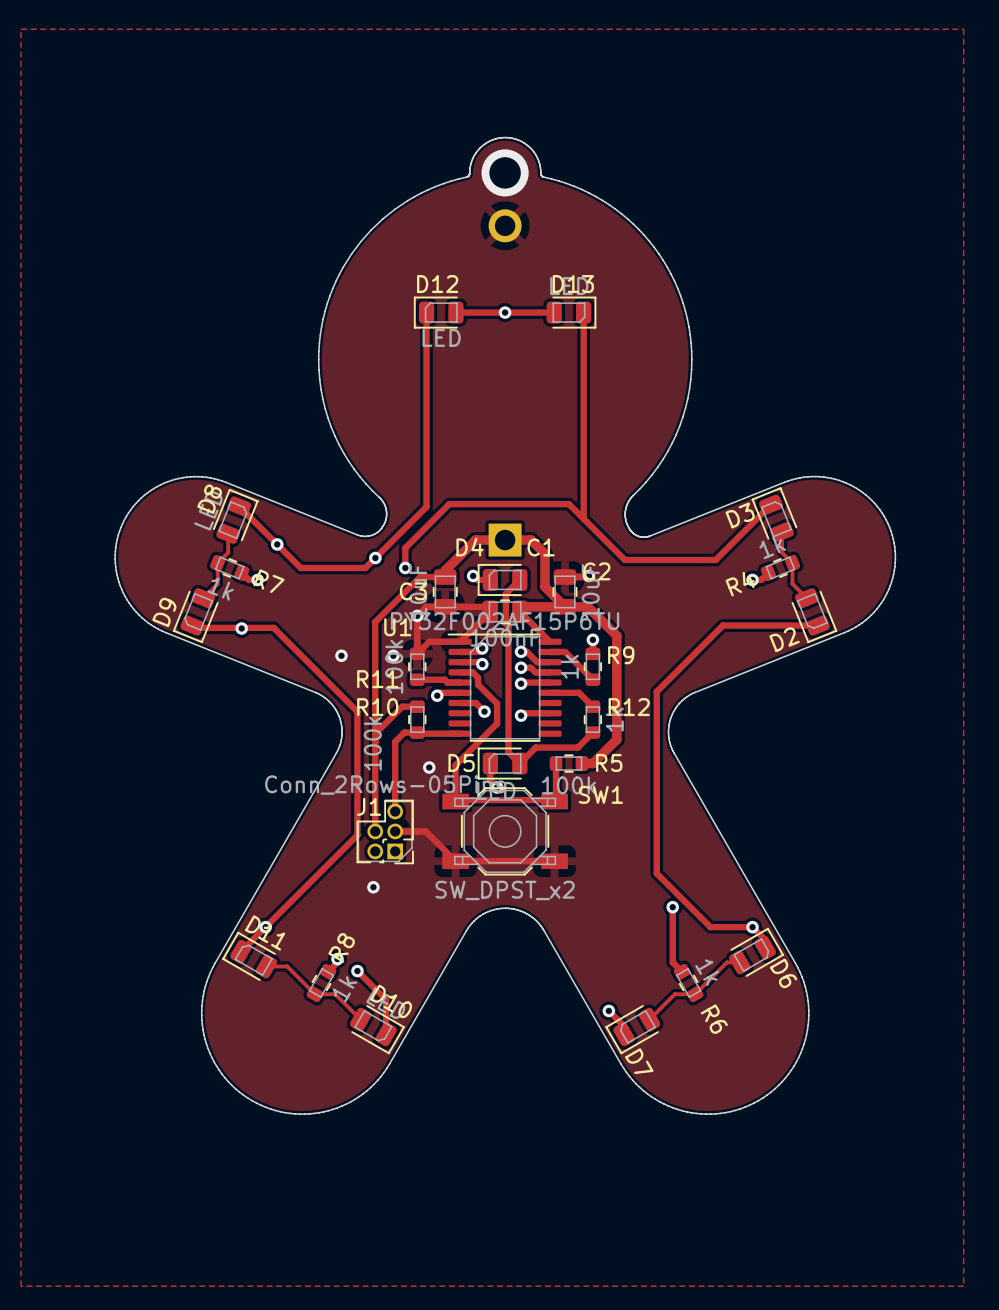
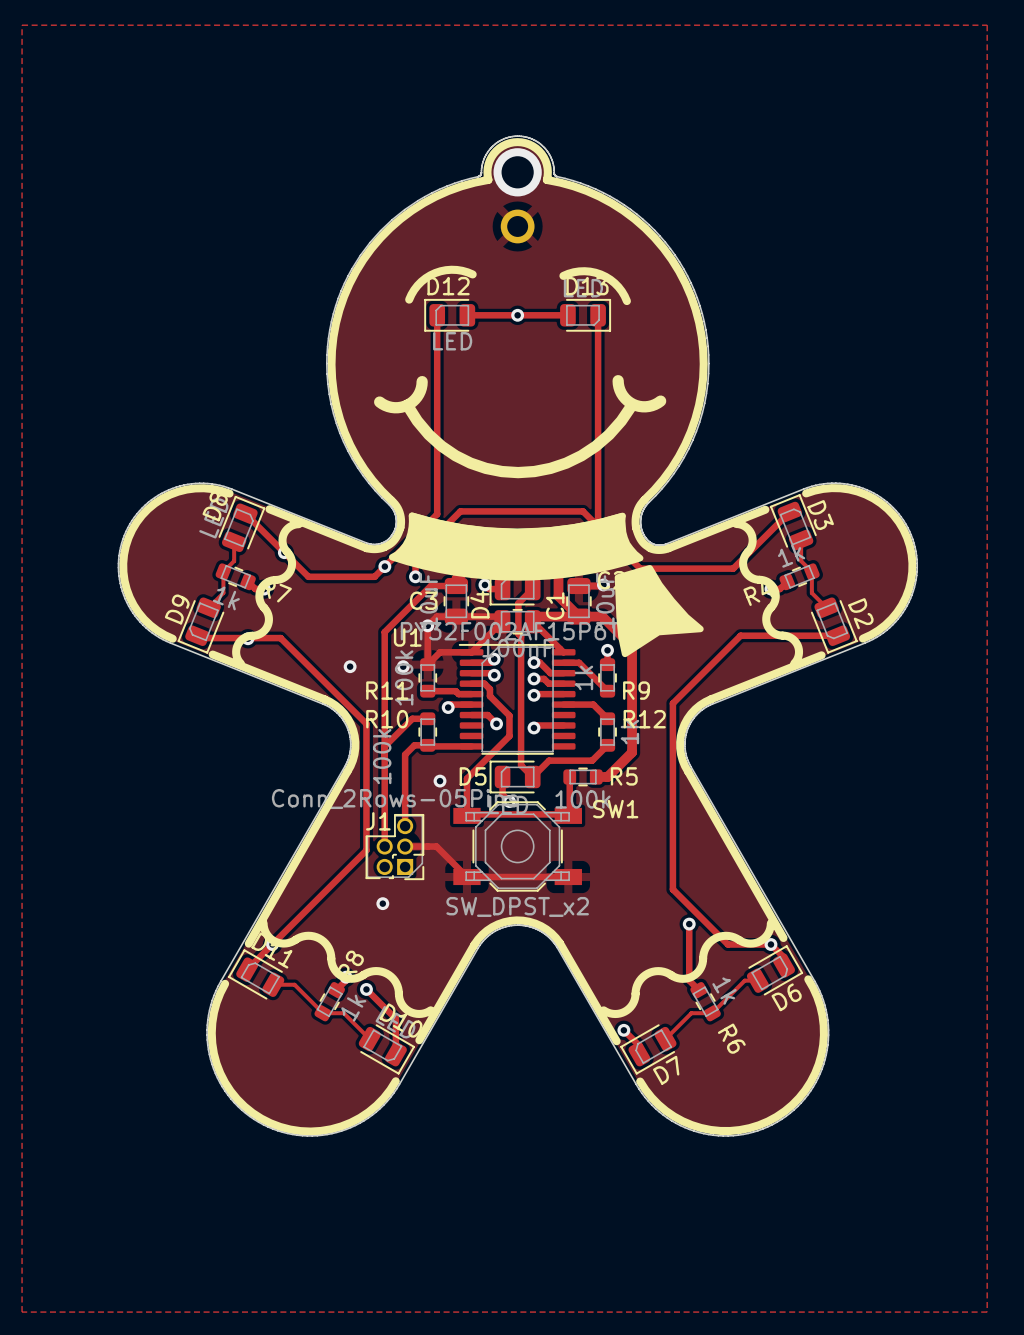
line: none -> (472, 274) (451, 269) (435, 273) (417, 285) (409, 299)
line: none -> (563, 275) (579, 271) (600, 274) (618, 287) (626, 301)
line: none -> (618, 380) (623, 395) (632, 404) (648, 406) (660, 401)
line: none -> (422, 381) (417, 396) (407, 405) (394, 407) (379, 402)
line: none -> (407, 405) (428, 434) (455, 455) (485, 468) (518, 472) (550, 468) (581, 455) (609, 434) (632, 405)
line: none -> (229, 493) (212, 489) (195, 488) (169, 494) (148, 509) (136, 522) (128, 537) (123, 563) (124, 580) (129, 597) (138, 612) (150, 625) (172, 638)
line: none -> (806, 493) (823, 488) (840, 488) (865, 494) (880, 503) (893, 515) (907, 537) (911, 554) (912, 571) (905, 597) (897, 612) (885, 625) (862, 638)
line: none -> (390, 499) (399, 512) (400, 527) (391, 542) (376, 549) (366, 548) (269, 509)
line: none -> (644, 499) (663, 479) (678, 456) (690, 431) (699, 405) (703, 377) (703, 350) (699, 322) (691, 296) (671, 259) (644, 227) (623, 210) (599, 196) (573, 186) (546, 179) (547, 168) (541, 153) (529, 144) (517, 142) (502, 146) (493, 153) (487, 168) (488, 179) (461, 186) (435, 196) (411, 210) (390, 228) (363, 259) (343, 296) (335, 323) (331, 350) (332, 378) (336, 406) (344, 432) (356, 457) (372, 480) (391, 500)
line: none -> (644, 499) (637, 511) (636, 527) (643, 543) (657, 549) (668, 548) (765, 509)
drawing: none -> [388, 512, 704, 658]
D3 name rotation: 0° (740, 515) -> 90° clockwise (820, 515)
D3 name position: D3 (740, 515) -> D3 (820, 515)
line: none -> (298, 524) (288, 528) (282, 537) (283, 547) (291, 560) (290, 569) (284, 577) (268, 581) (261, 588) (259, 599) (267, 612) (268, 622) (263, 631) (252, 635)
line: none -> (736, 524) (746, 527) (752, 537) (751, 547) (743, 560) (744, 569) (750, 577) (766, 581) (773, 588) (775, 599) (767, 612) (766, 621) (771, 631) (782, 635)
D4 name rotation: 0° (469, 547) -> 90° counterclockwise (479, 604)
D4 name position: D4 (469, 547) -> D4 (479, 604)
C1 name rotation: 0° (541, 547) -> 90° counterclockwise (555, 606)
C1 name position: C1 (541, 547) -> C1 (555, 606)
D9 name position: D9 (164, 612) -> D9 (177, 609)
line: none -> (252, 635) (243, 638) (237, 645) (236, 655) (240, 663)
line: none -> (782, 635) (791, 638) (797, 645) (798, 655) (794, 663)
D2 name rotation: 0° (784, 639) -> 90° clockwise (860, 613)
D2 name position: D2 (784, 639) -> D2 (860, 613)
line: none -> (212, 654) (330, 702) (340, 709) (347, 718) (354, 736) (354, 754) (350, 766) (248, 943)
line: none -> (821, 655) (705, 701) (691, 713) (684, 724) (680, 735) (680, 748) (685, 766) (783, 938)
R9 name position: R9 (621, 655) -> R9 (636, 690)
line: none -> (263, 923) (267, 934) (279, 942) (288, 942) (305, 935) (319, 938) (328, 947) (332, 965) (340, 975) (351, 978) (370, 971) (384, 972) (396, 983) (400, 1000) (405, 1008) (416, 1013) (430, 1010)
line: none -> (770, 923) (767, 934) (755, 943) (745, 942) (728, 935) (715, 938) (705, 947) (701, 965) (694, 975) (682, 978) (663, 971) (650, 972) (638, 983) (634, 1000) (628, 1008) (615, 1014) (603, 1010)
line: none -> (808, 979) (817, 996) (822, 1015) (823, 1035) (821, 1054) (815, 1073) (805, 1090) (792, 1104) (776, 1116) (758, 1125) (739, 1130) (720, 1130) (700, 1127) (682, 1121) (665, 1110) (651, 1097) (640, 1081)
line: none -> (225, 983) (216, 1002) (212, 1022) (212, 1043) (216, 1063) (230, 1091) (244, 1106) (261, 1118) (280, 1126) (300, 1131) (331, 1129) (350, 1122) (368, 1112) (383, 1098) (395, 1081)
D6 name rotation: 0° (783, 973) -> 90° counterclockwise (786, 997)
line: none -> (419, 1040) (478, 939) (492, 927) (504, 922) (516, 920) (529, 921) (541, 926) (555, 937) (616, 1041)
D7 name rotation: 0° (639, 1061) -> 90° counterclockwise (666, 1070)

